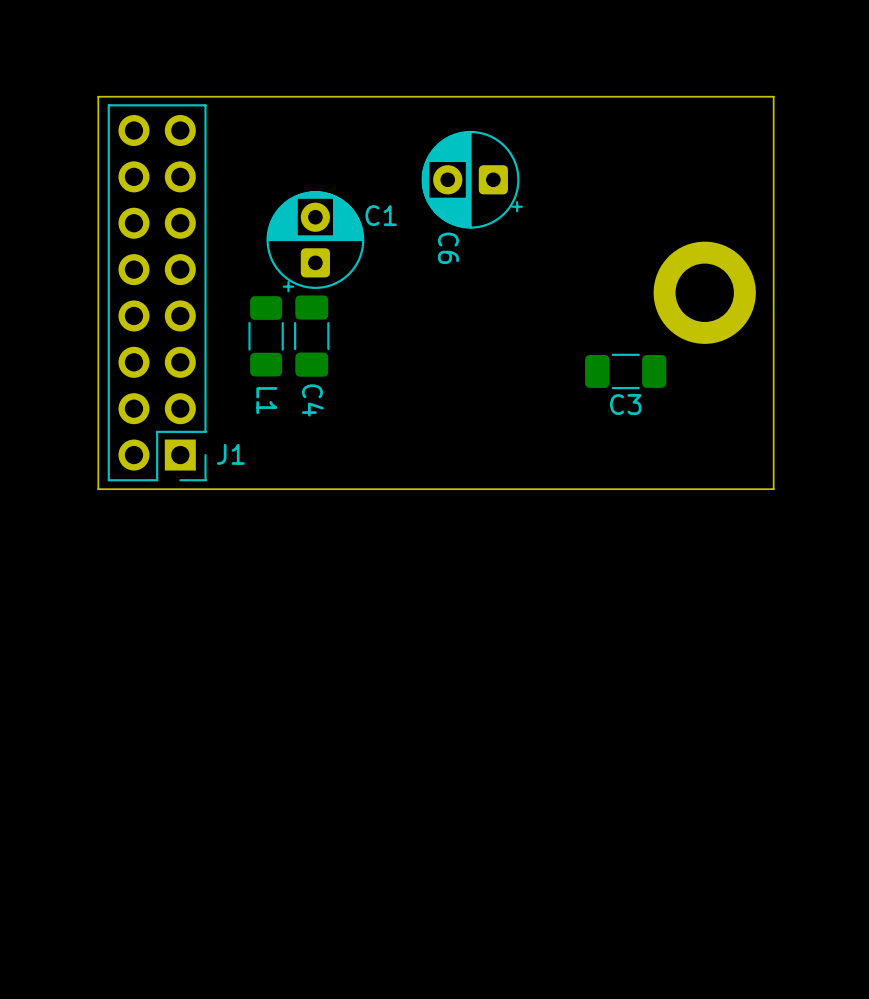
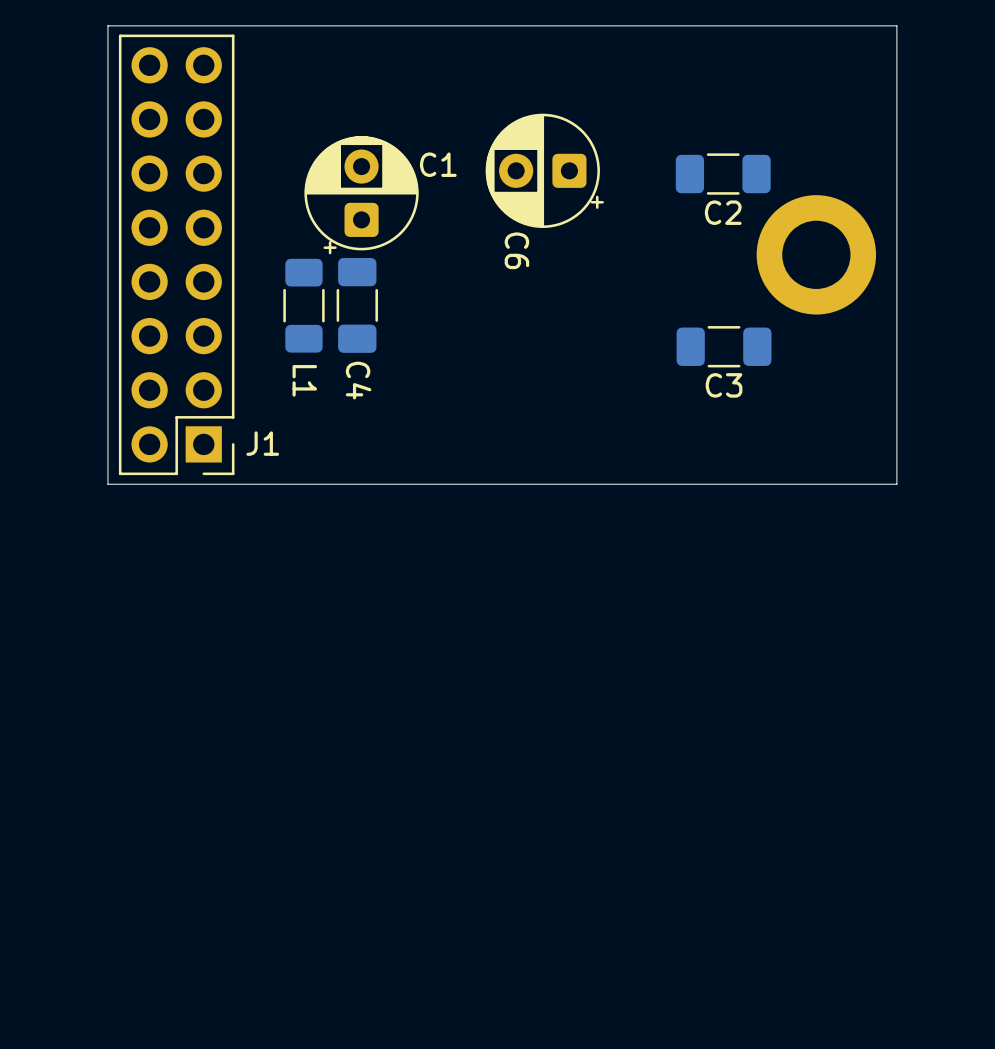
C6 position: (472, 179) -> (544, 170)
C2: none -> (723, 174)

